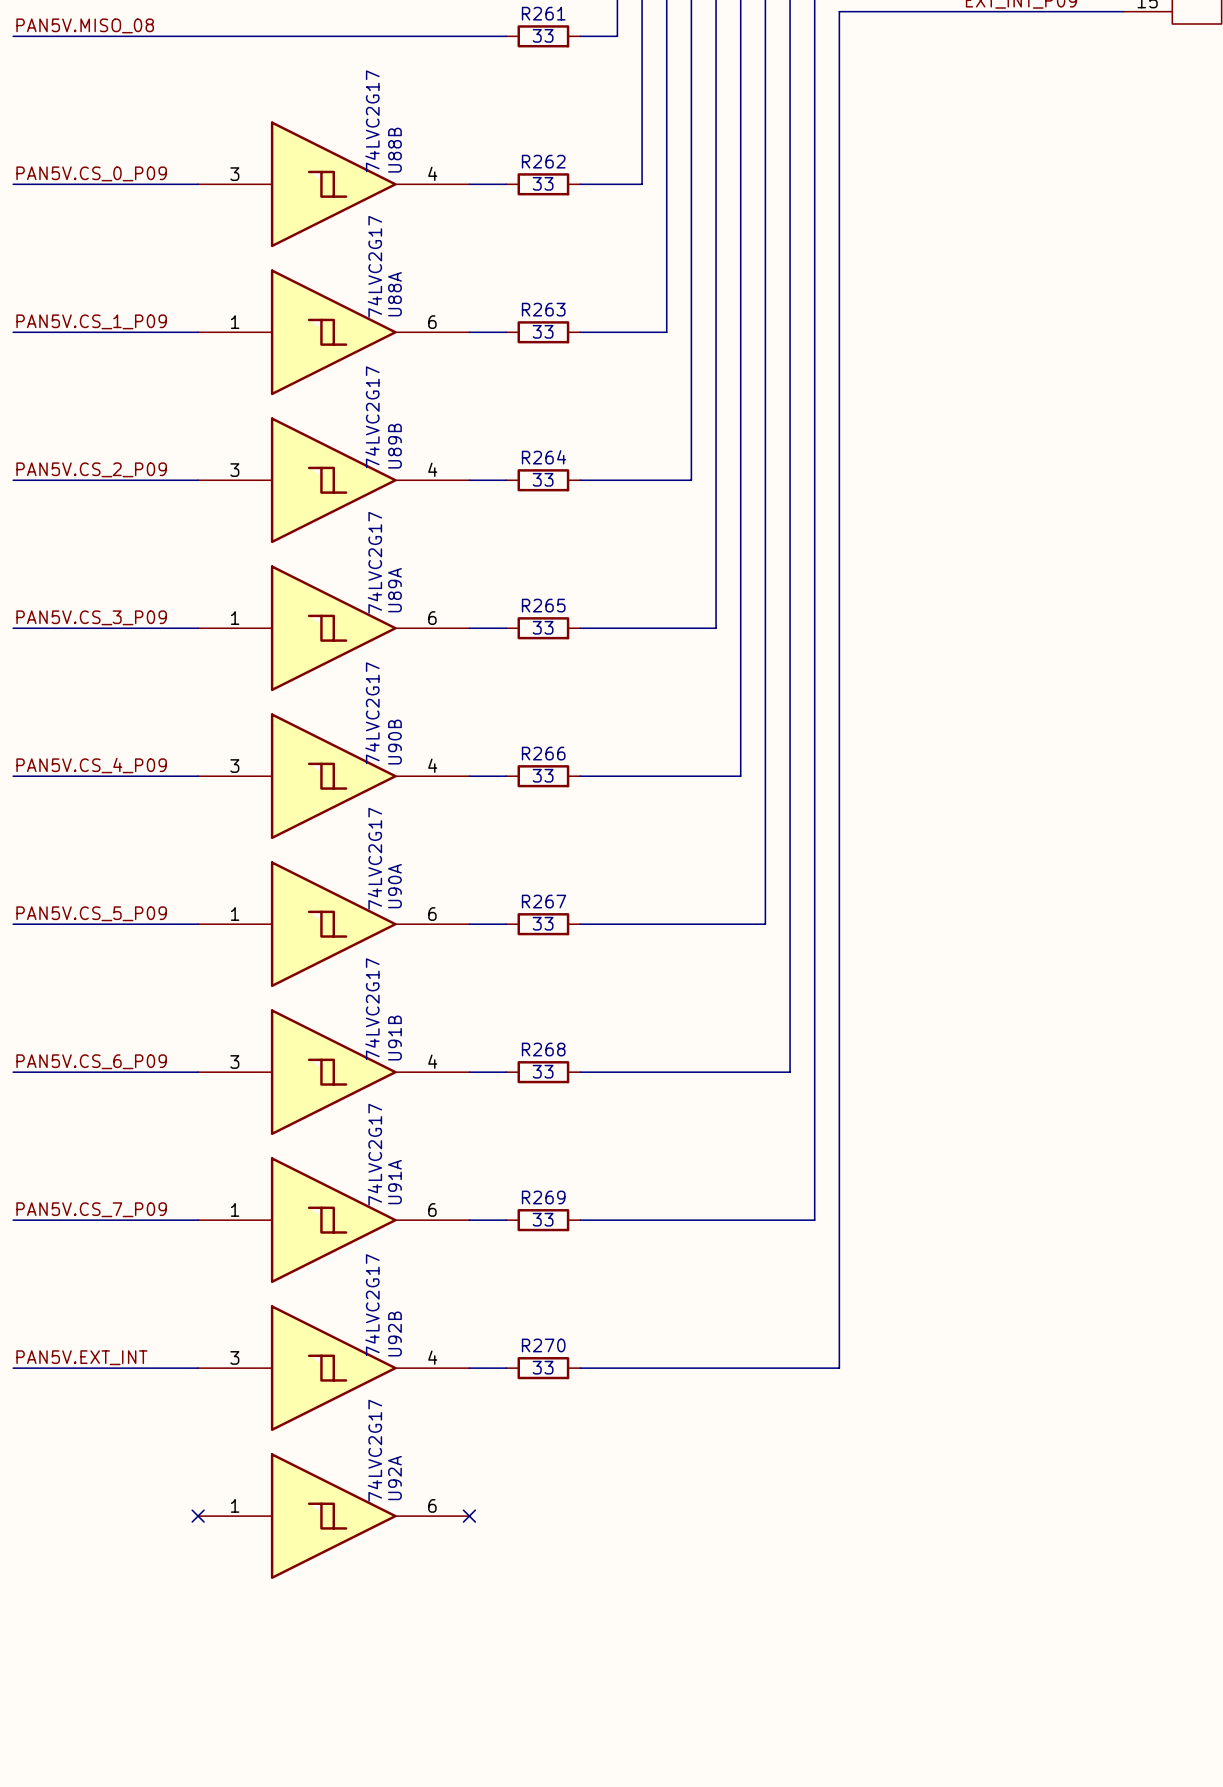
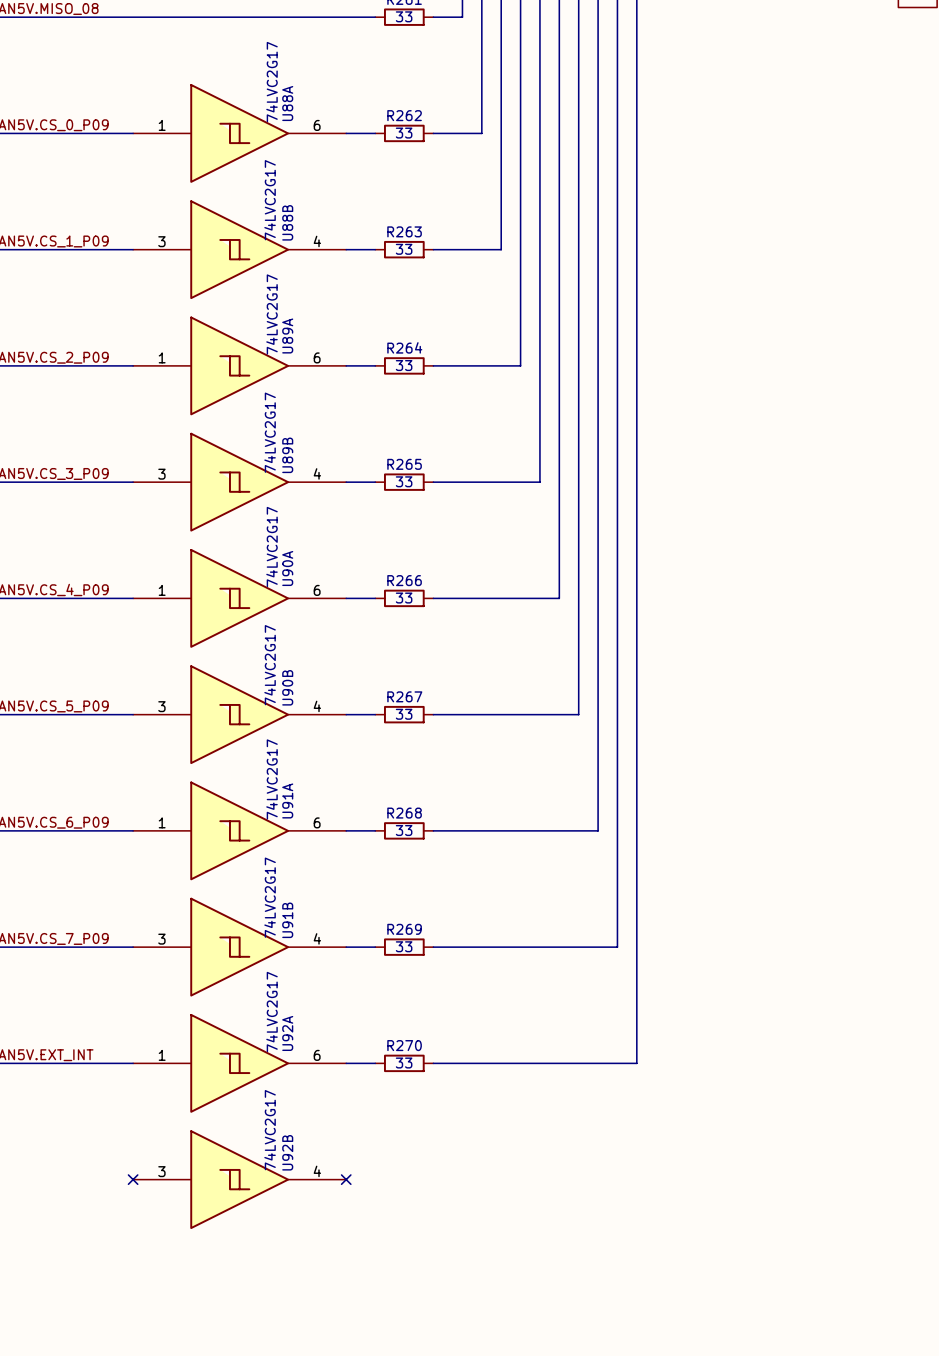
U88B position: (333, 184) -> (239, 249)
U88A position: (333, 332) -> (239, 133)
U89B position: (333, 480) -> (239, 482)
U89A position: (333, 628) -> (239, 365)
U90B position: (333, 776) -> (239, 714)
U90A position: (333, 924) -> (239, 598)
U91B position: (333, 1072) -> (239, 947)
U91A position: (333, 1220) -> (239, 830)
U92B position: (333, 1368) -> (239, 1179)
U92A position: (333, 1516) -> (239, 1063)

